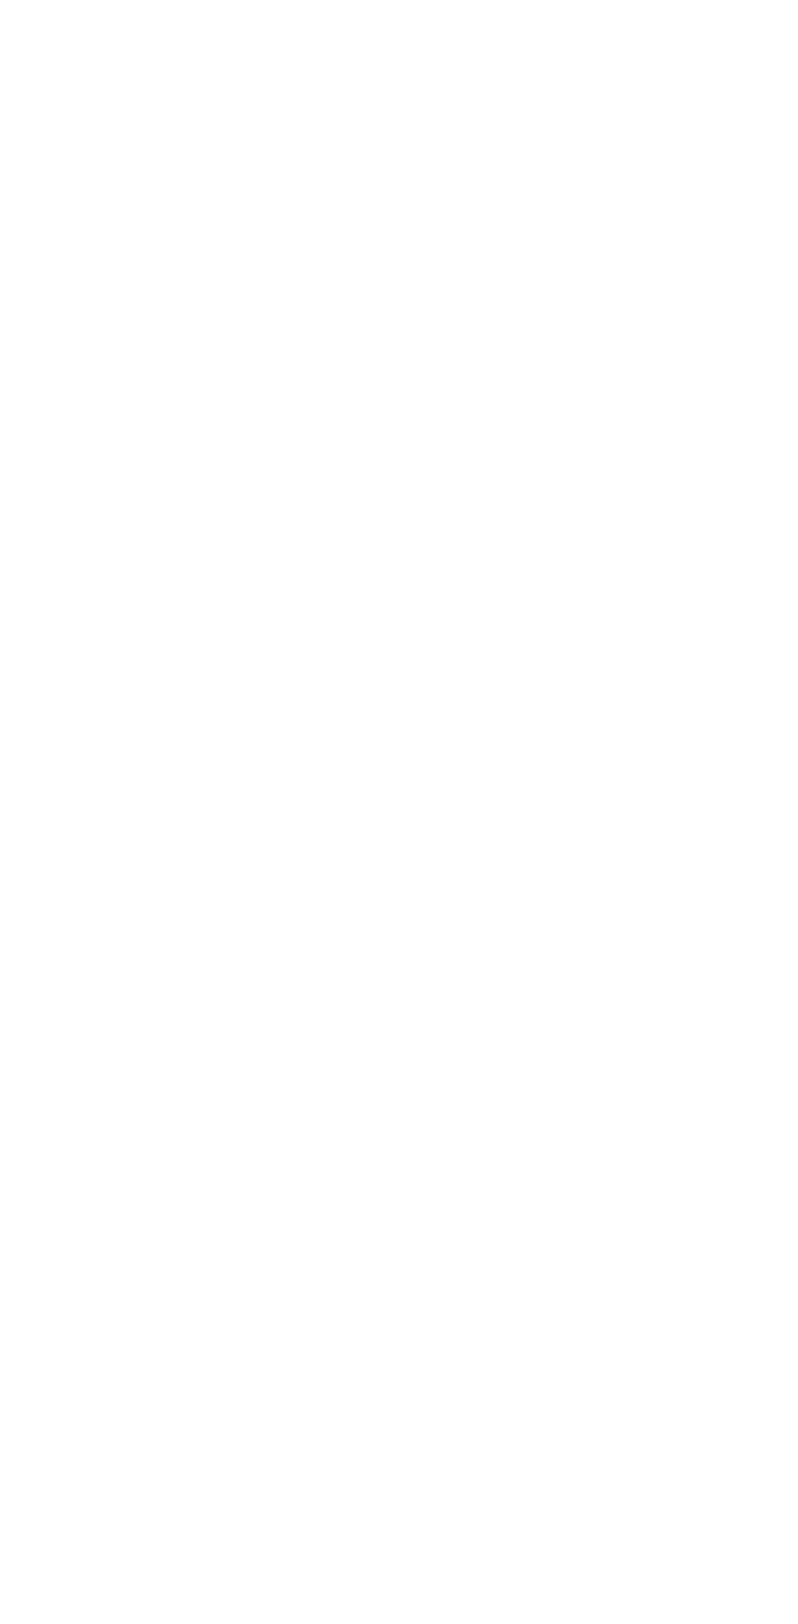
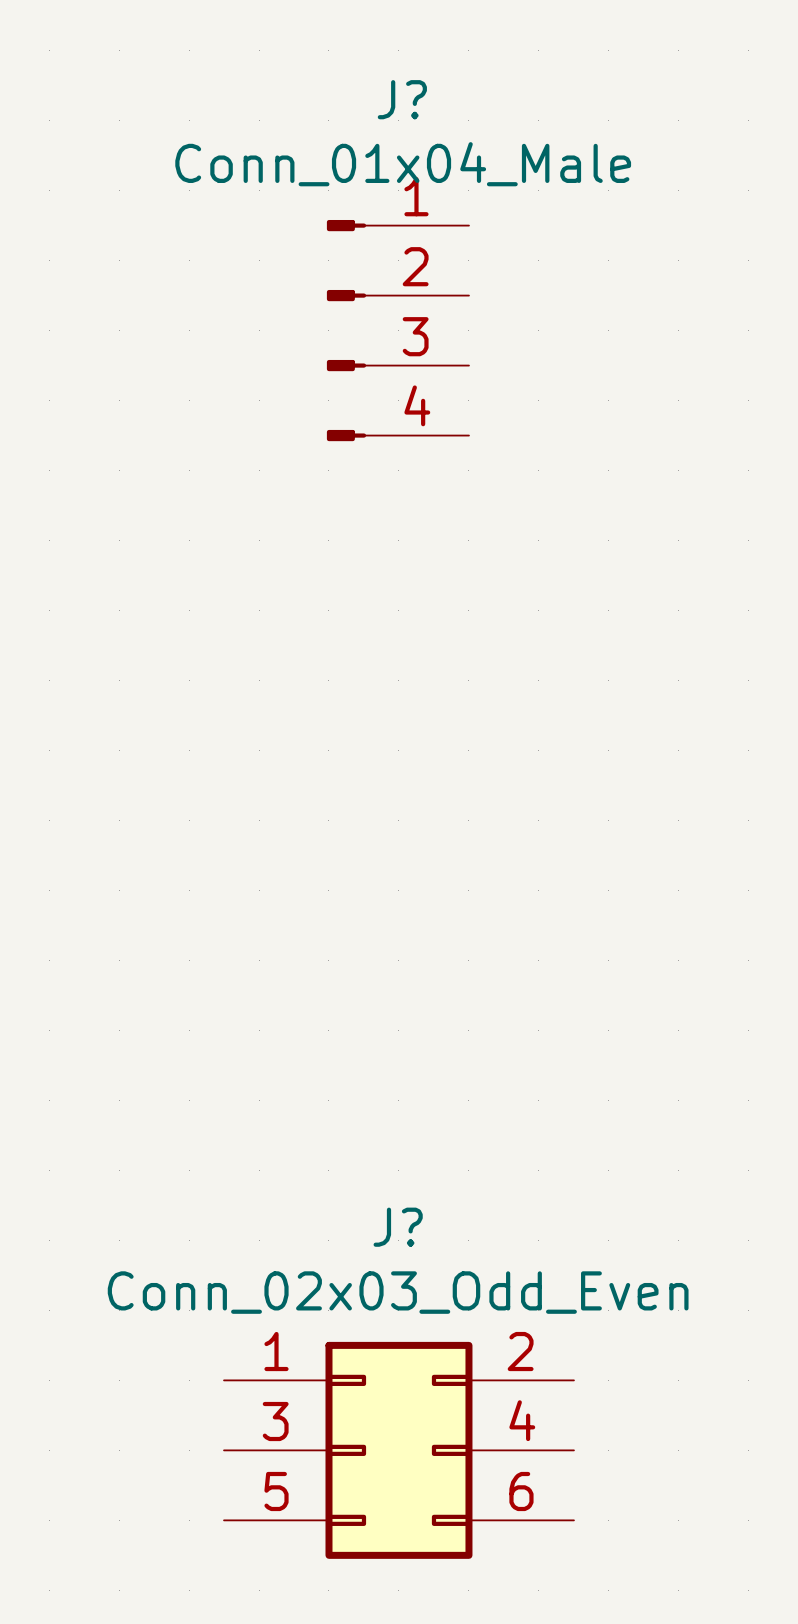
J?: none -> Conn_01x04_Male (397, 330)
J?: none -> Conn_02x03_Odd_Even (398, 1450)

